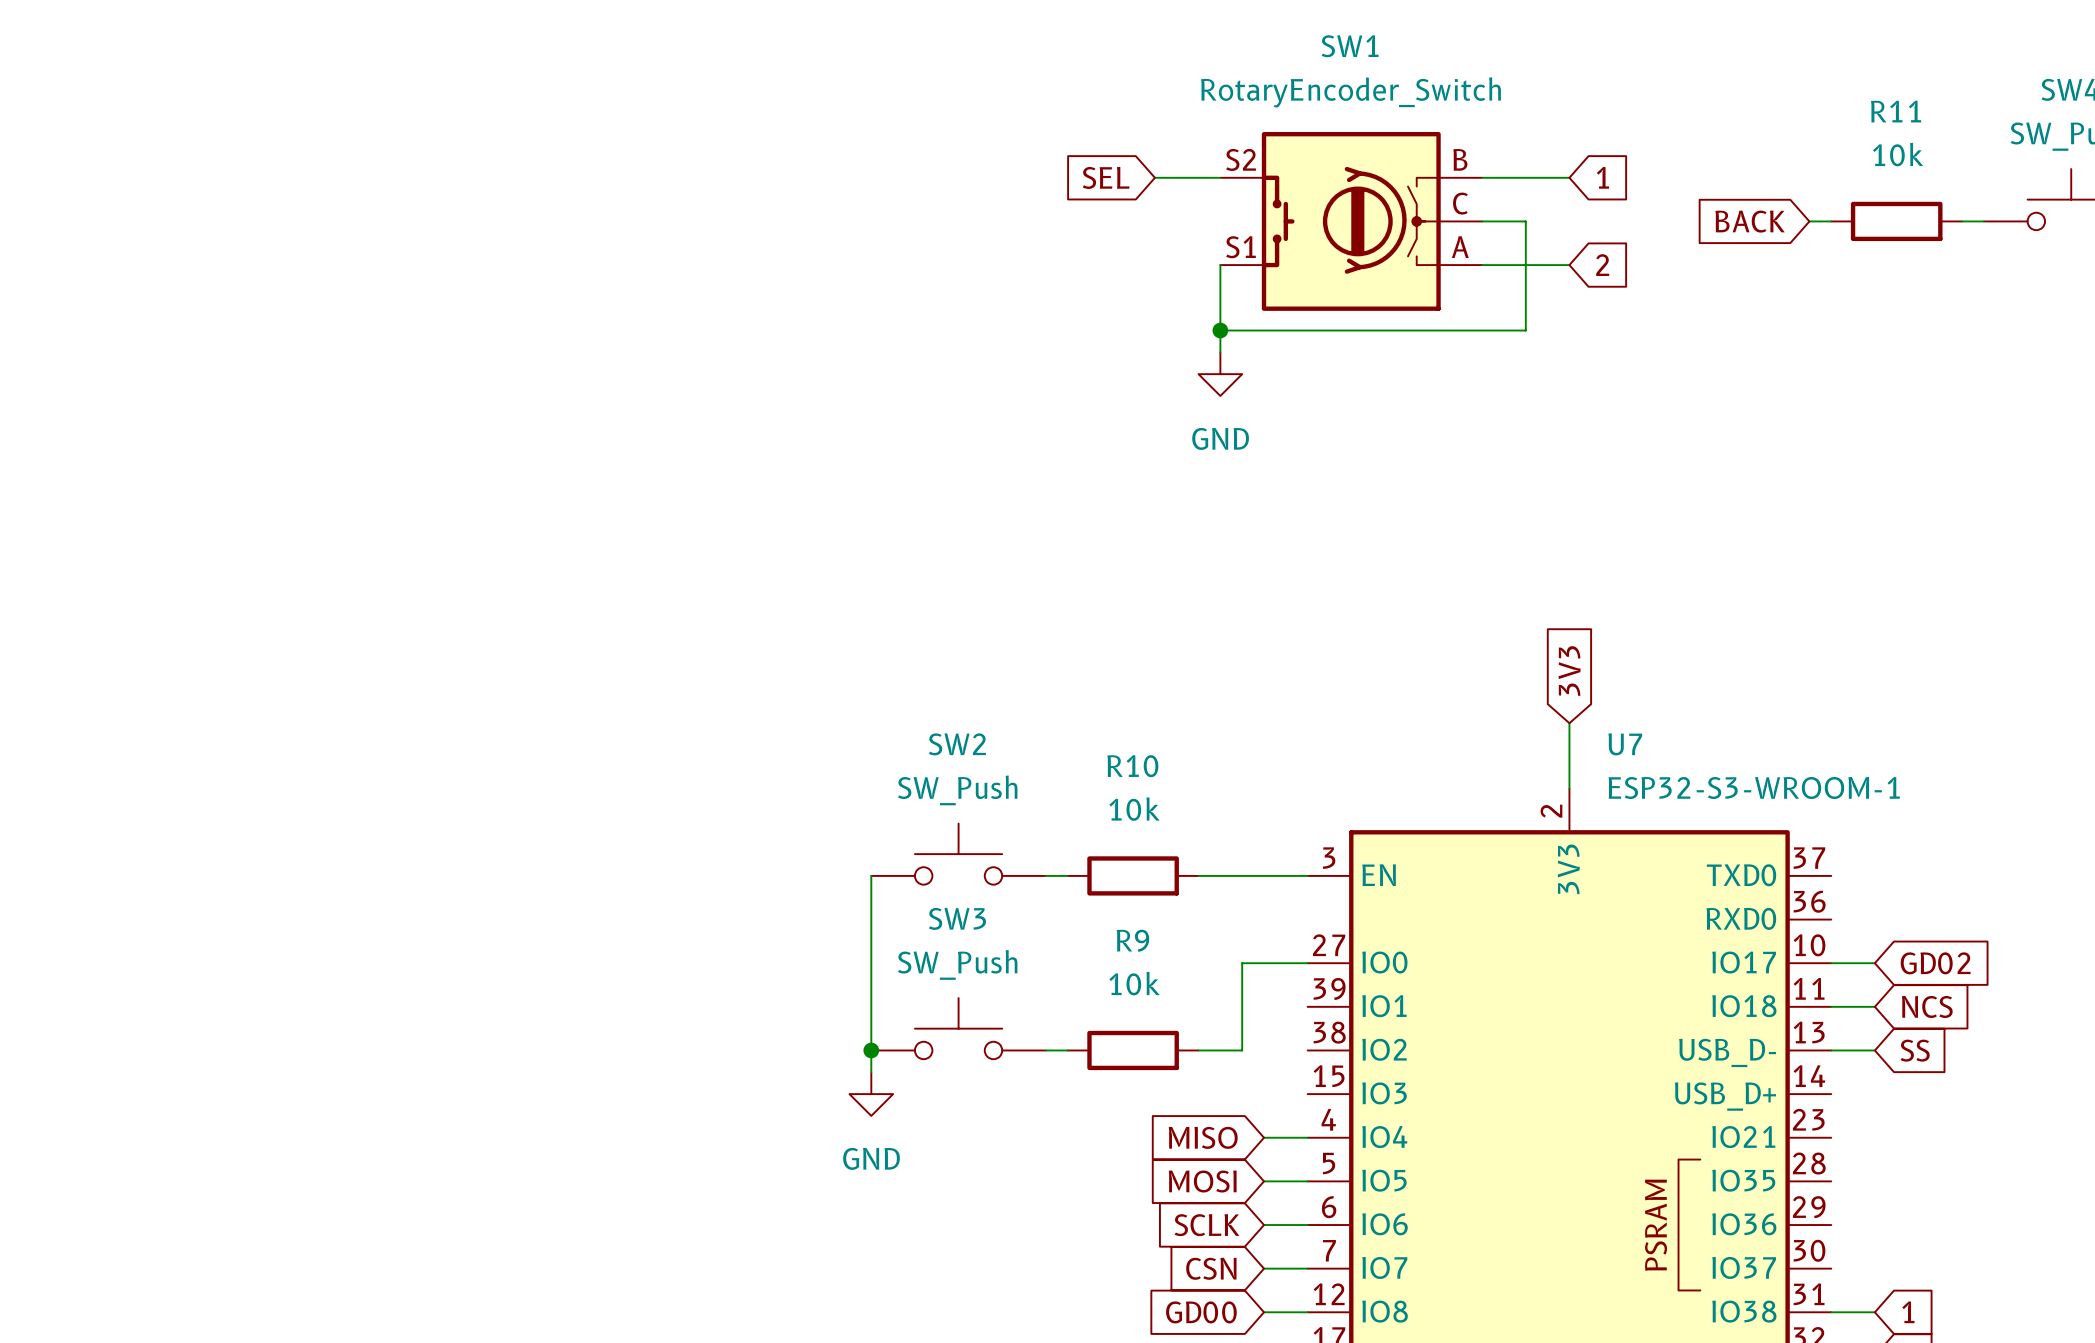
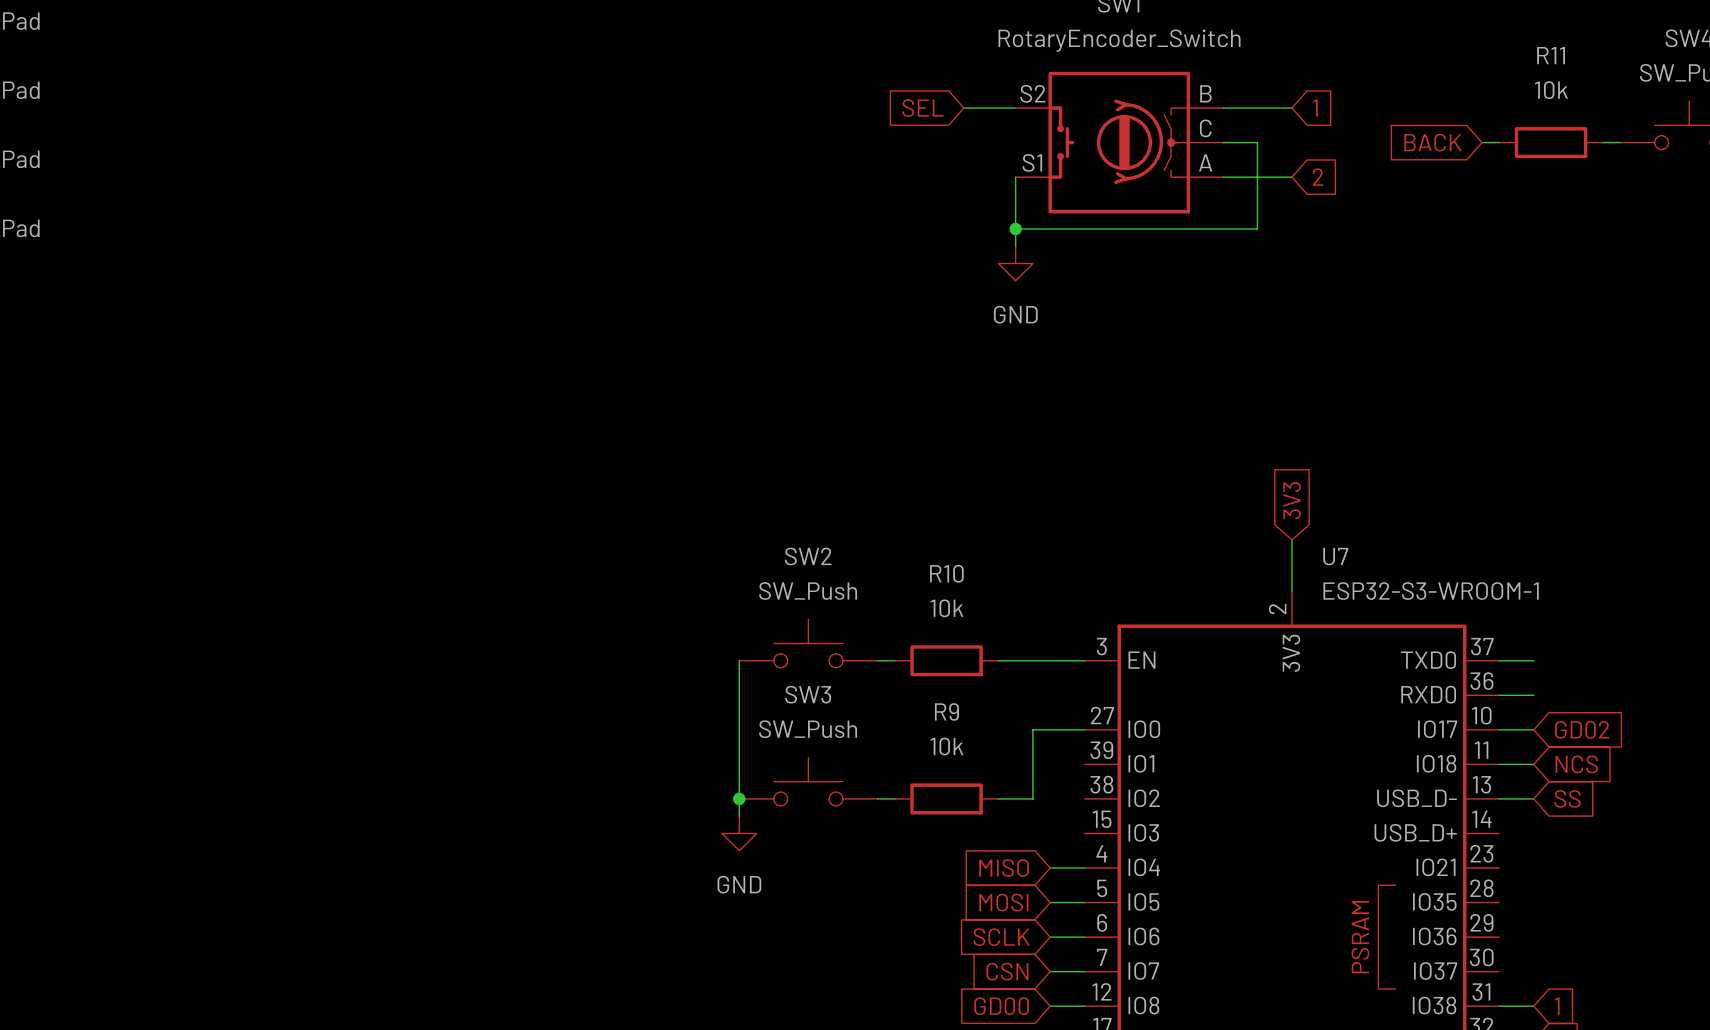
wire: none -> (1499, 660) (1533, 660)
wire: none -> (1499, 695) (1533, 695)

